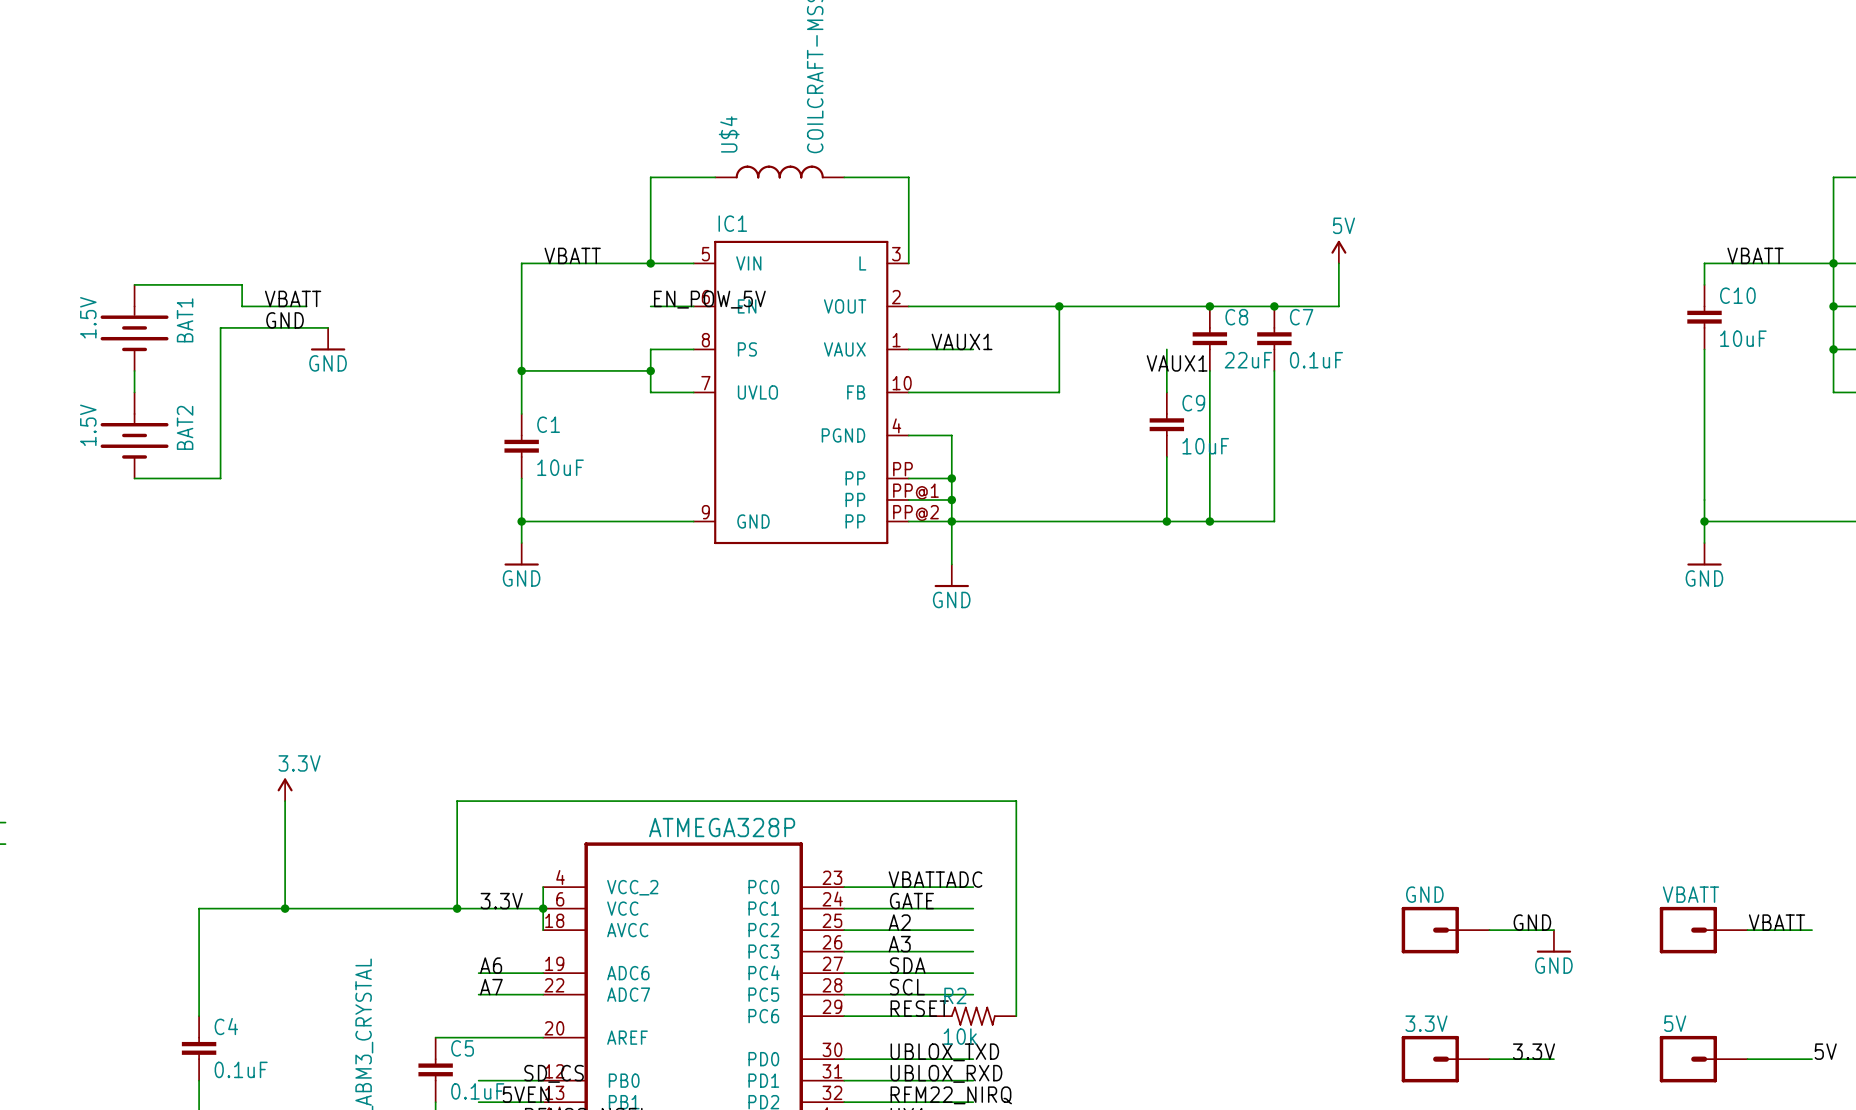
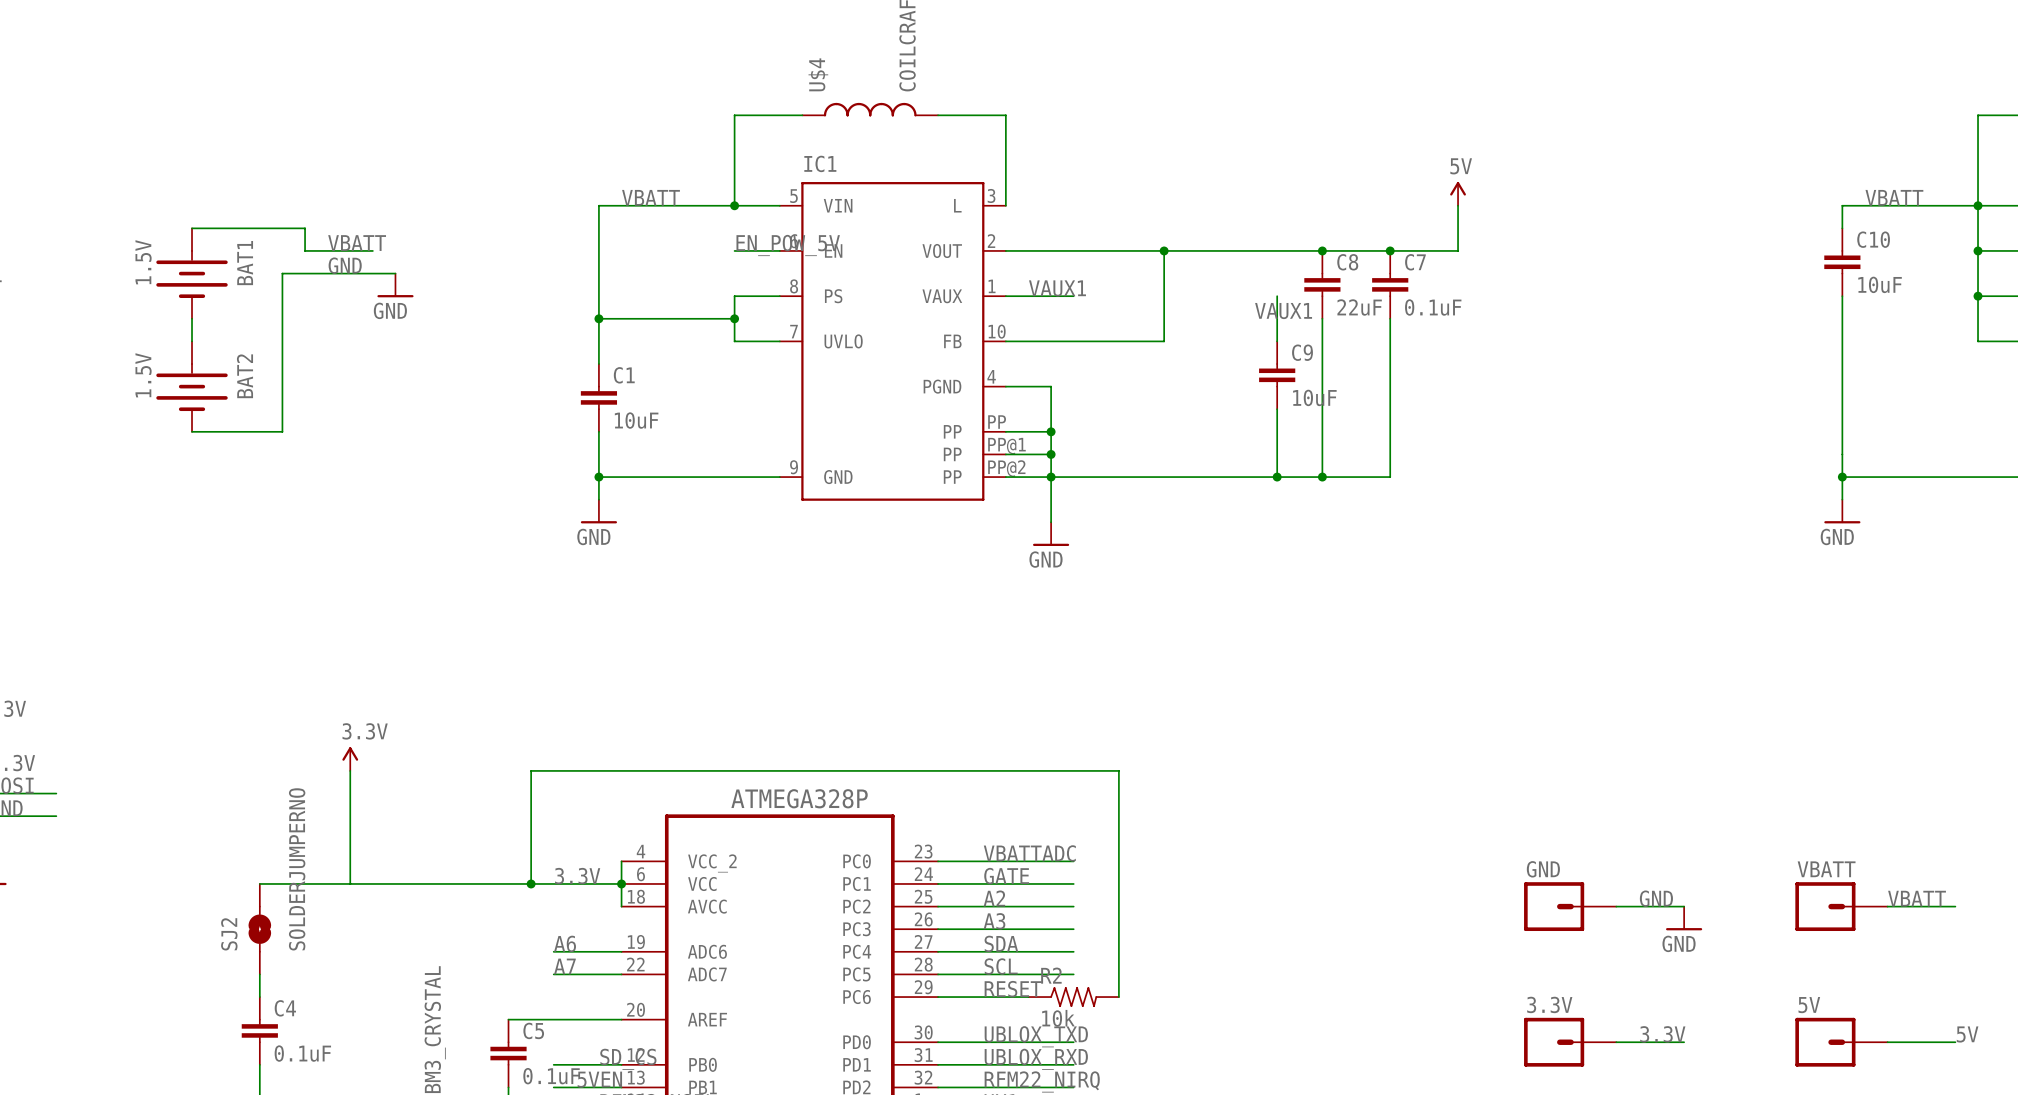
junction: (285, 908) -> none
SJ2: none -> SOLDERJUMPERNO (259, 929)

